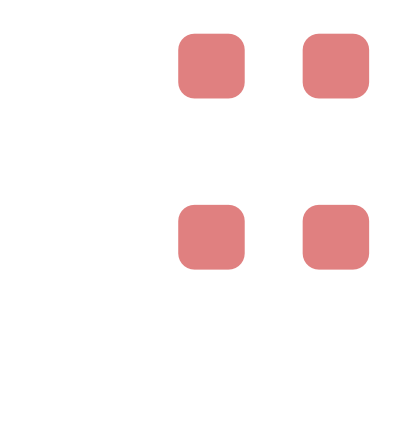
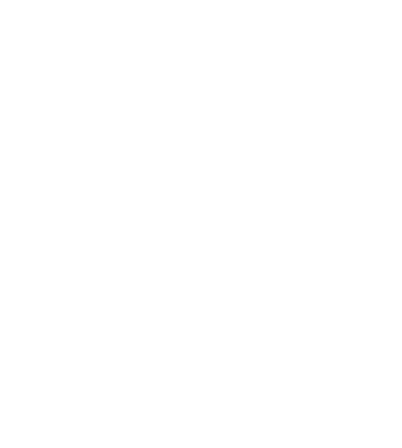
part: (273, 66) -> none
part: (273, 237) -> none

